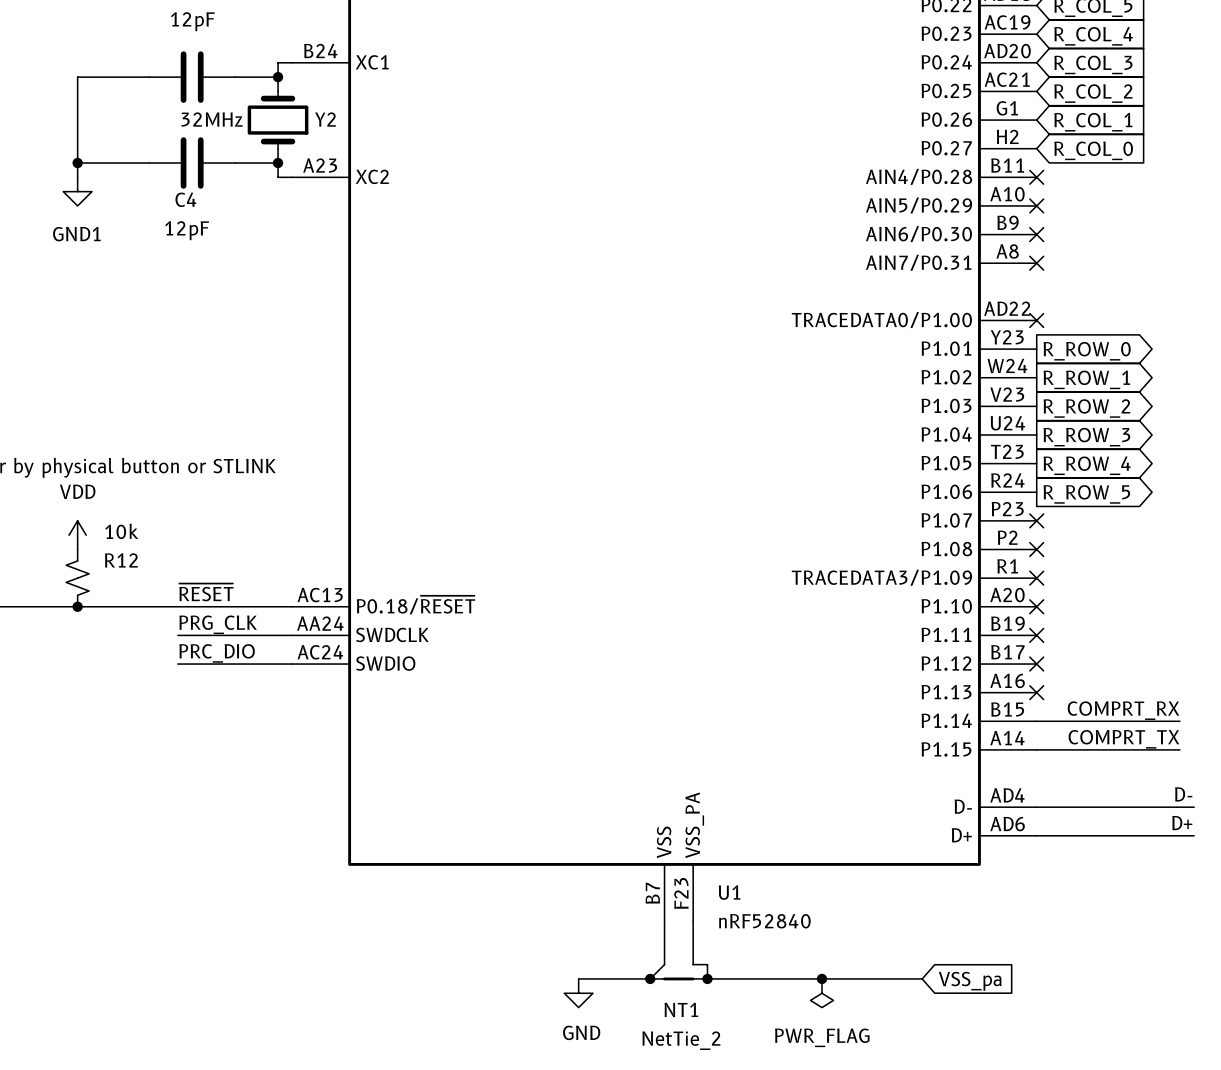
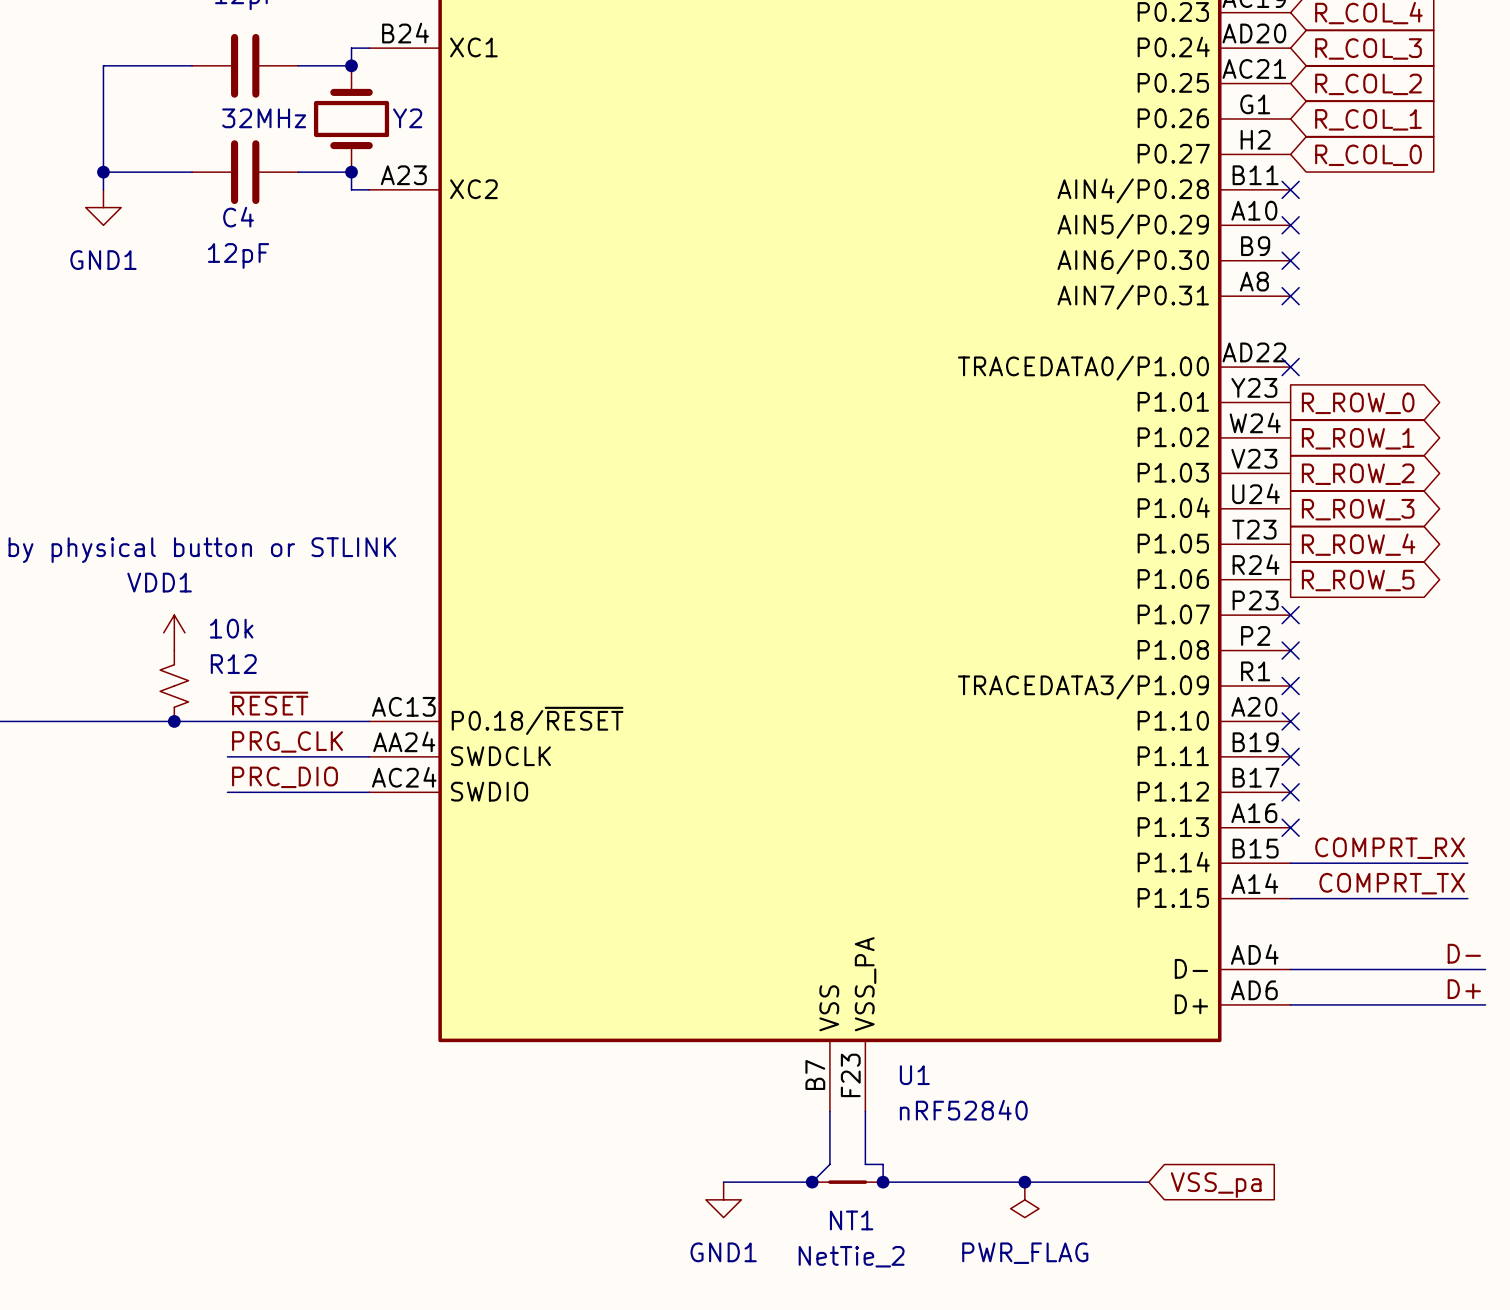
power symbol: VDD (77, 535) -> none
power symbol: none -> VDD1 (174, 632)
R12 position: (77, 578) -> (174, 686)
junction position: (77, 606) -> (174, 721)
power symbol: GND (578, 993) -> GND1 (723, 1199)

